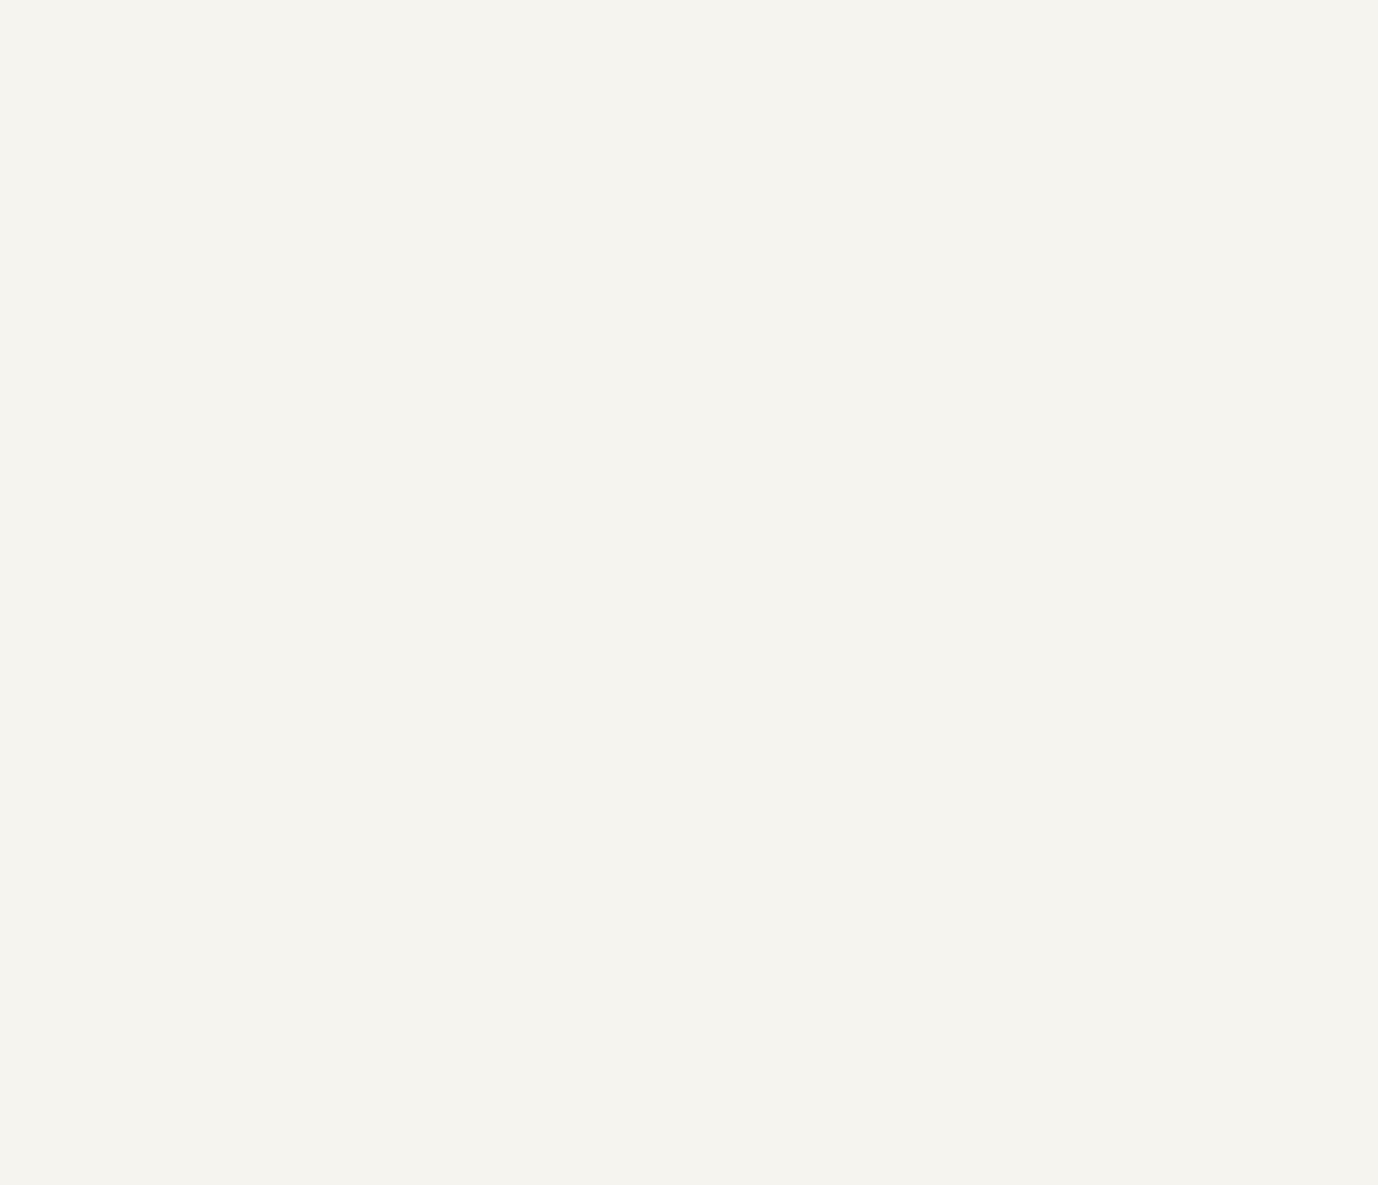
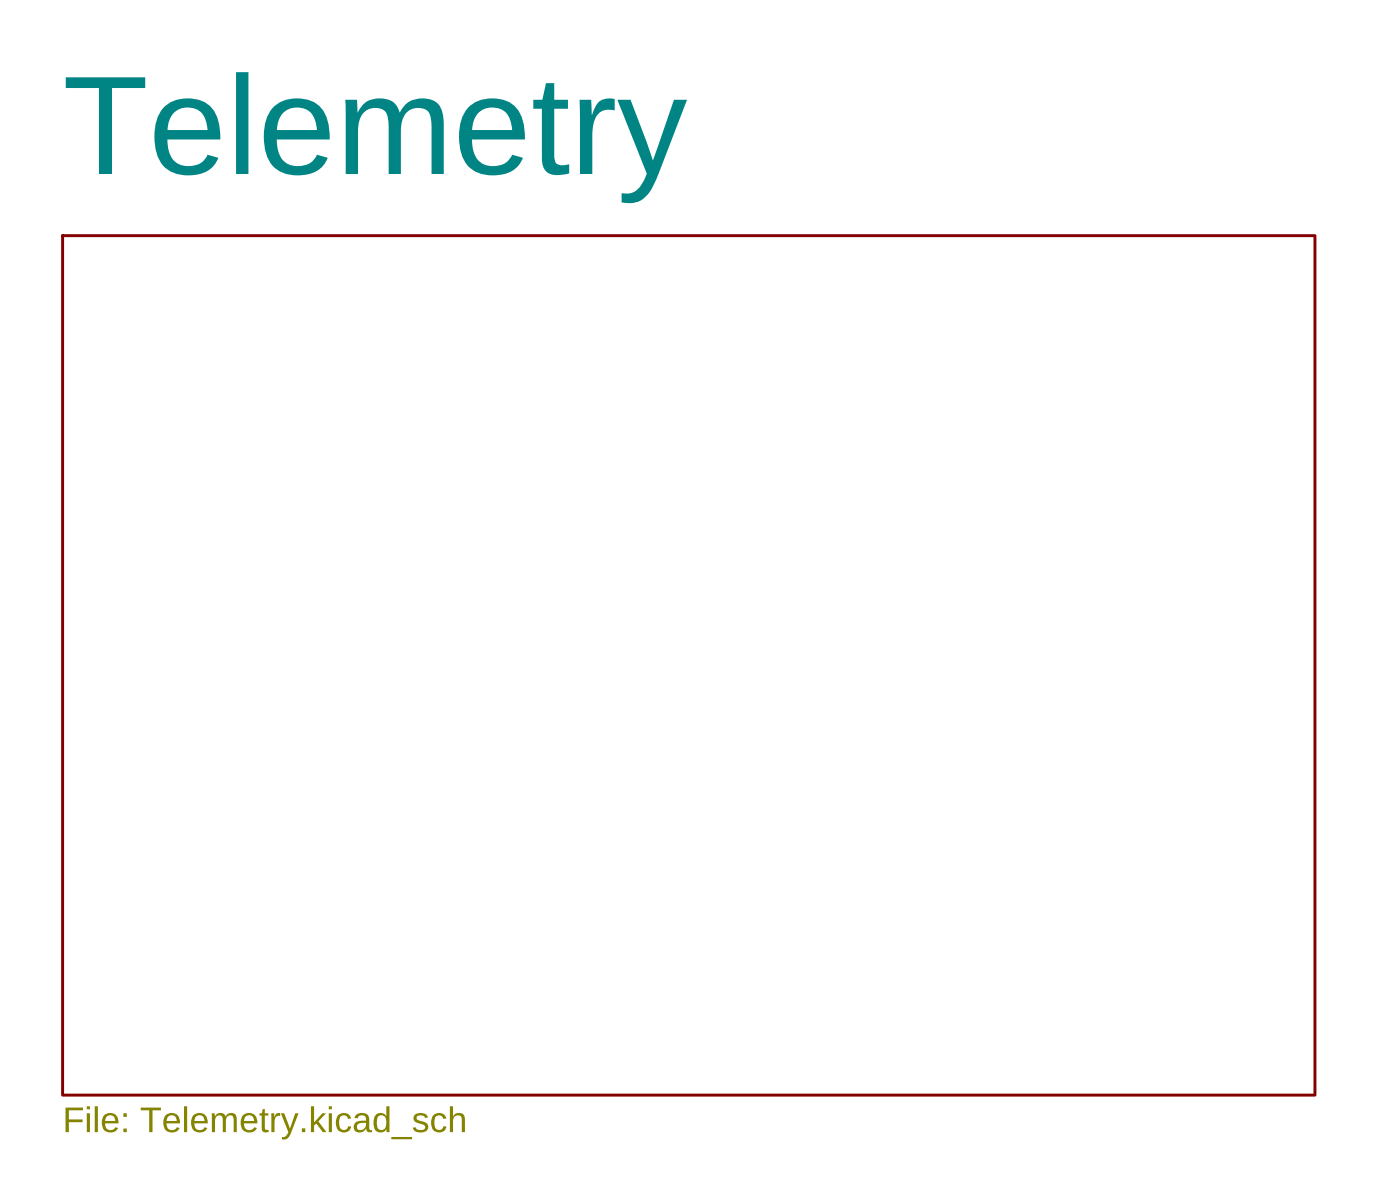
sheet Telemetry: none -> File: Telemetry.kicad_sch (688, 665)

